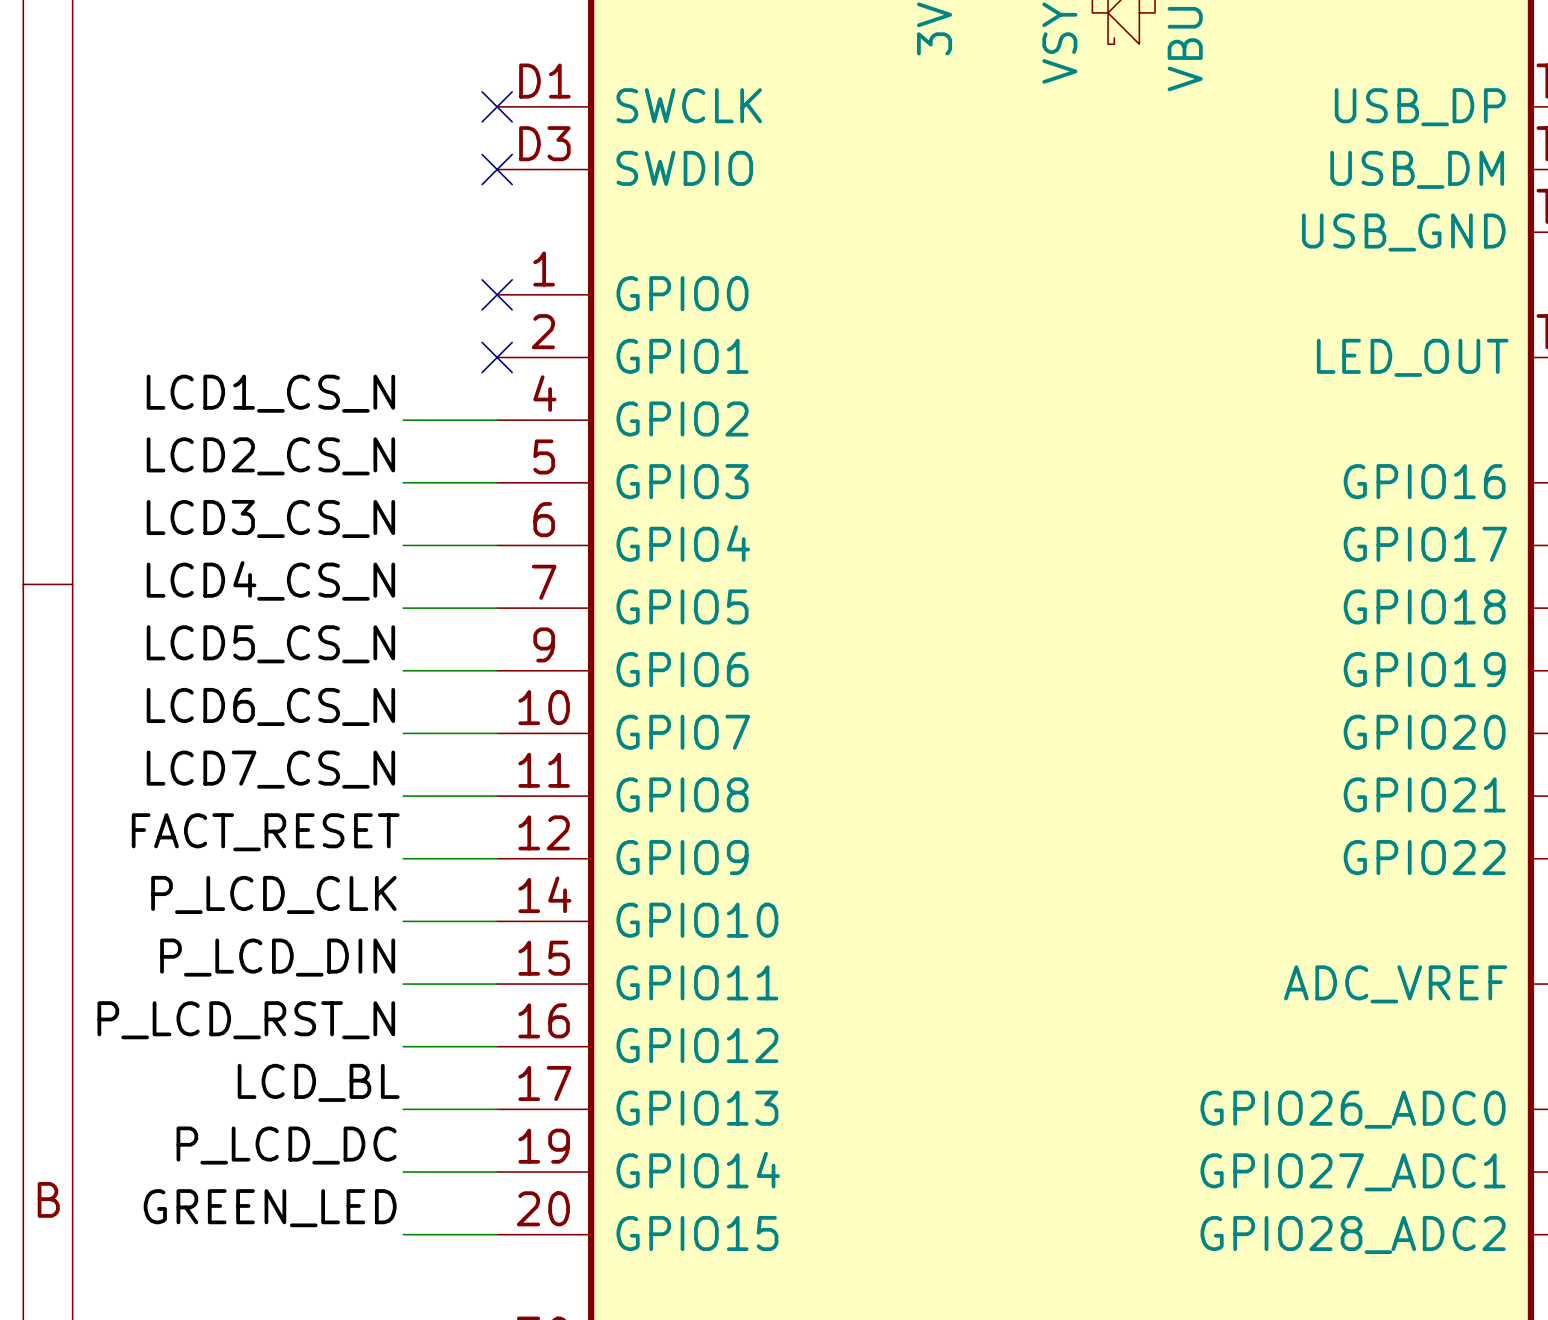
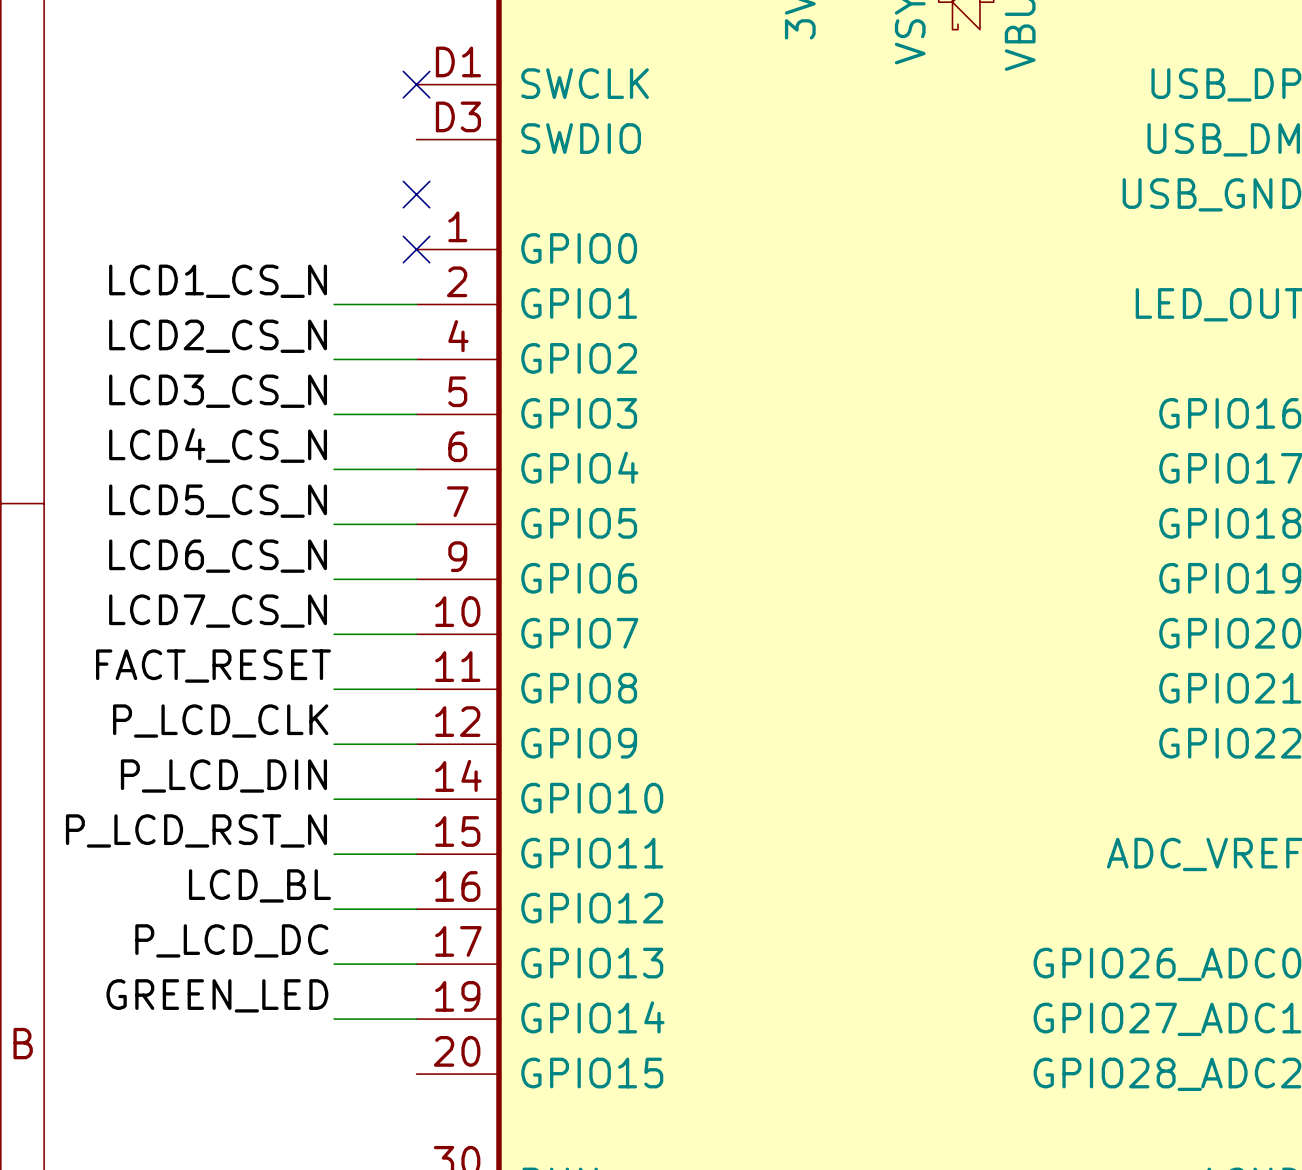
no-connect mark: (497, 169) -> none
no-connect mark: none -> (416, 194)
label: none -> LCD1_CS_N (218, 281)
wire: none -> (334, 304) (416, 304)
no-connect mark: (497, 357) -> none
label: LCD1_CS_N (270, 393) -> LCD2_CS_N (218, 336)
label: LCD2_CS_N (270, 456) -> LCD3_CS_N (218, 391)
label: LCD3_CS_N (270, 519) -> LCD4_CS_N (218, 445)
label: LCD4_CS_N (270, 580) -> LCD5_CS_N (218, 501)
label: LCD5_CS_N (270, 644) -> LCD6_CS_N (218, 556)
label: LCD6_CS_N (270, 706) -> LCD7_CS_N (218, 611)
label: LCD7_CS_N (270, 769) -> FACT_RESET (213, 666)
label: FACT_RESET (265, 832) -> P_LCD_CLK (220, 721)
label: P_LCD_CLK (273, 894) -> P_LCD_DIN (223, 775)
label: P_LCD_DIN (277, 957) -> P_LCD_RST_N (196, 830)
label: P_LCD_RST_N (246, 1020) -> LCD_BL (259, 885)
label: LCD_BL (318, 1082) -> P_LCD_DC (231, 940)
label: P_LCD_DC (286, 1145) -> GREEN_LED (217, 995)
label: GREEN_LED (270, 1208) -> none
wire: (403, 1234) (497, 1234) -> none

